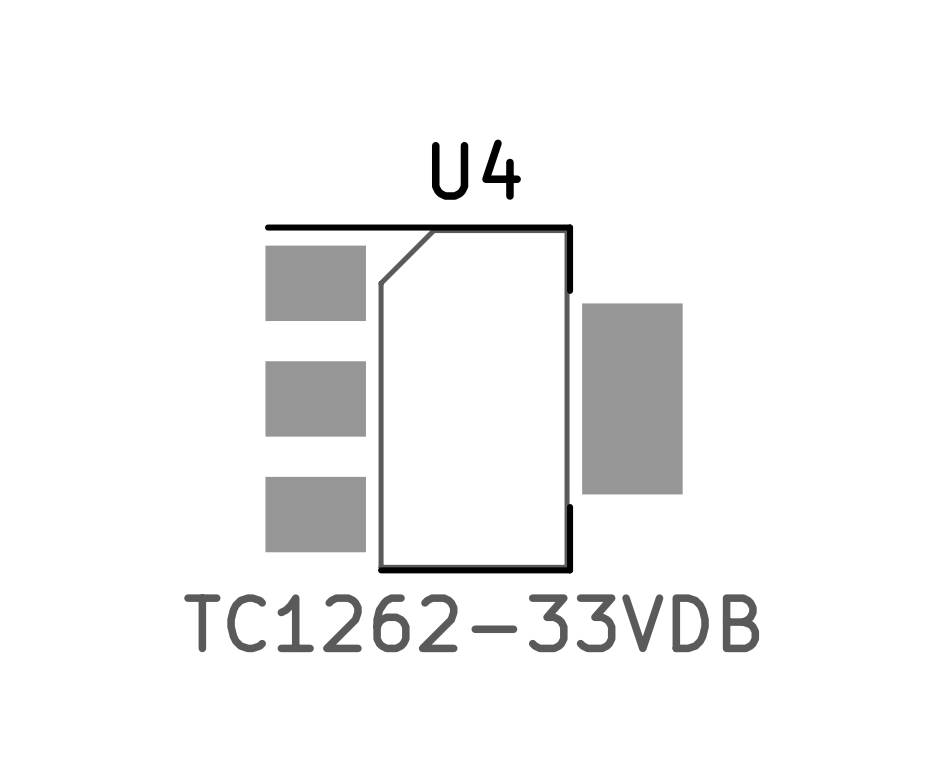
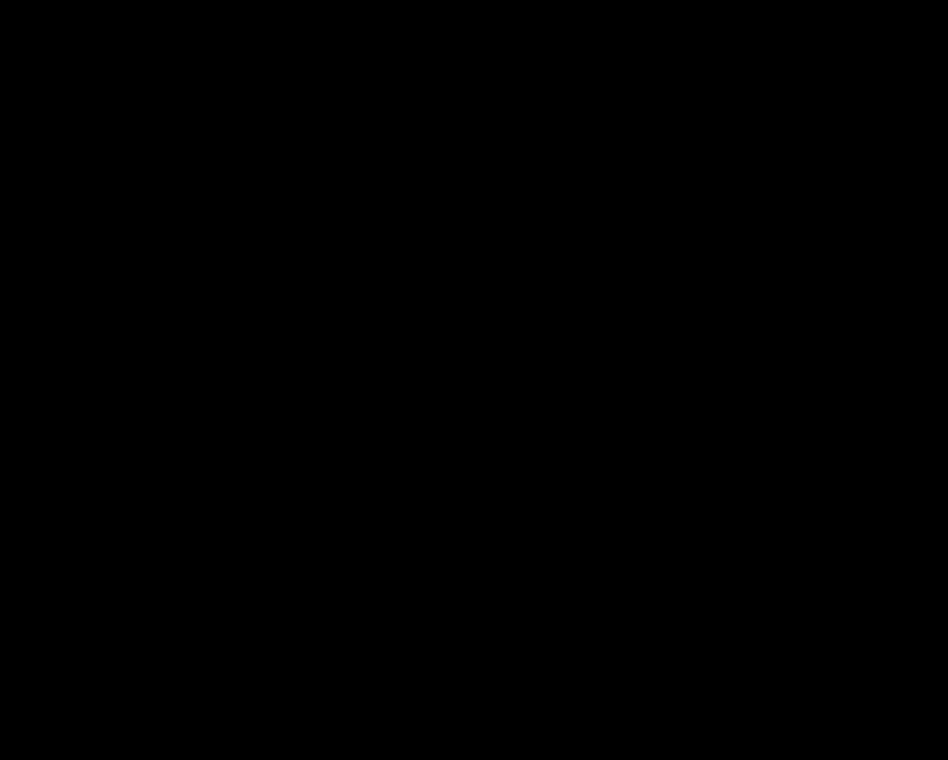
U4: TC1262-33VDB (473, 398) -> none

